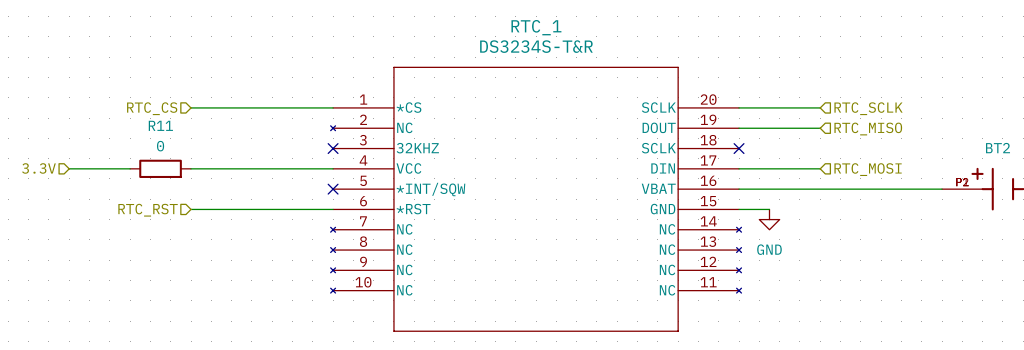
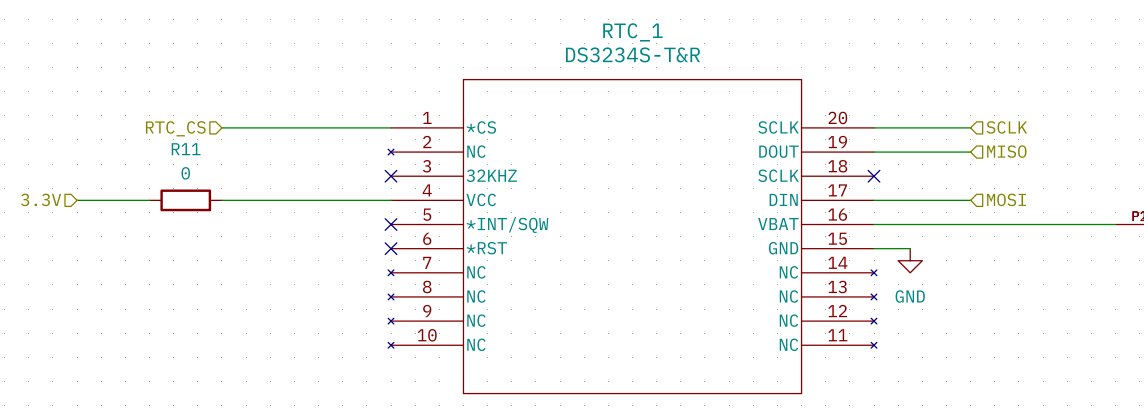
hierarchical label: RTC_SCLK (868, 108) -> SCLK (1006, 127)
hierarchical label: RTC_MISO (868, 129) -> MISO (1006, 151)
hierarchical label: RTC_MOSI (868, 169) -> MOSI (1006, 199)
wire: (191, 209) (333, 209) -> none
no-connect mark: none -> (391, 248)
hierarchical label: RTC_RST (148, 210) -> none

